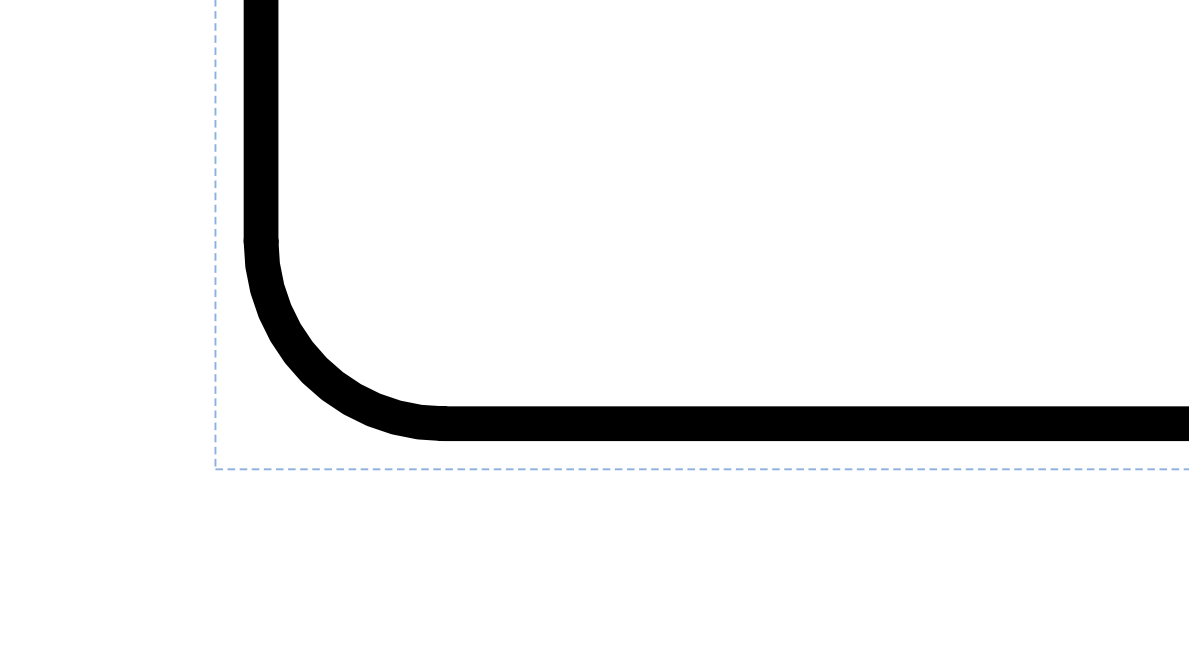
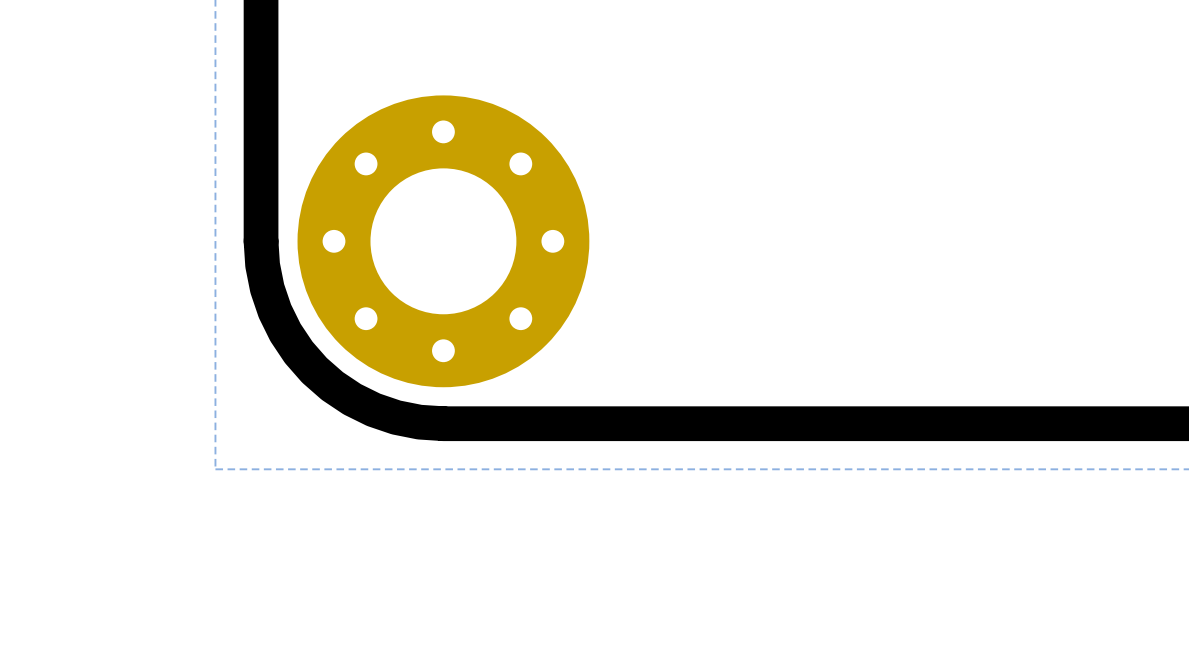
part: none -> (443, 241)

